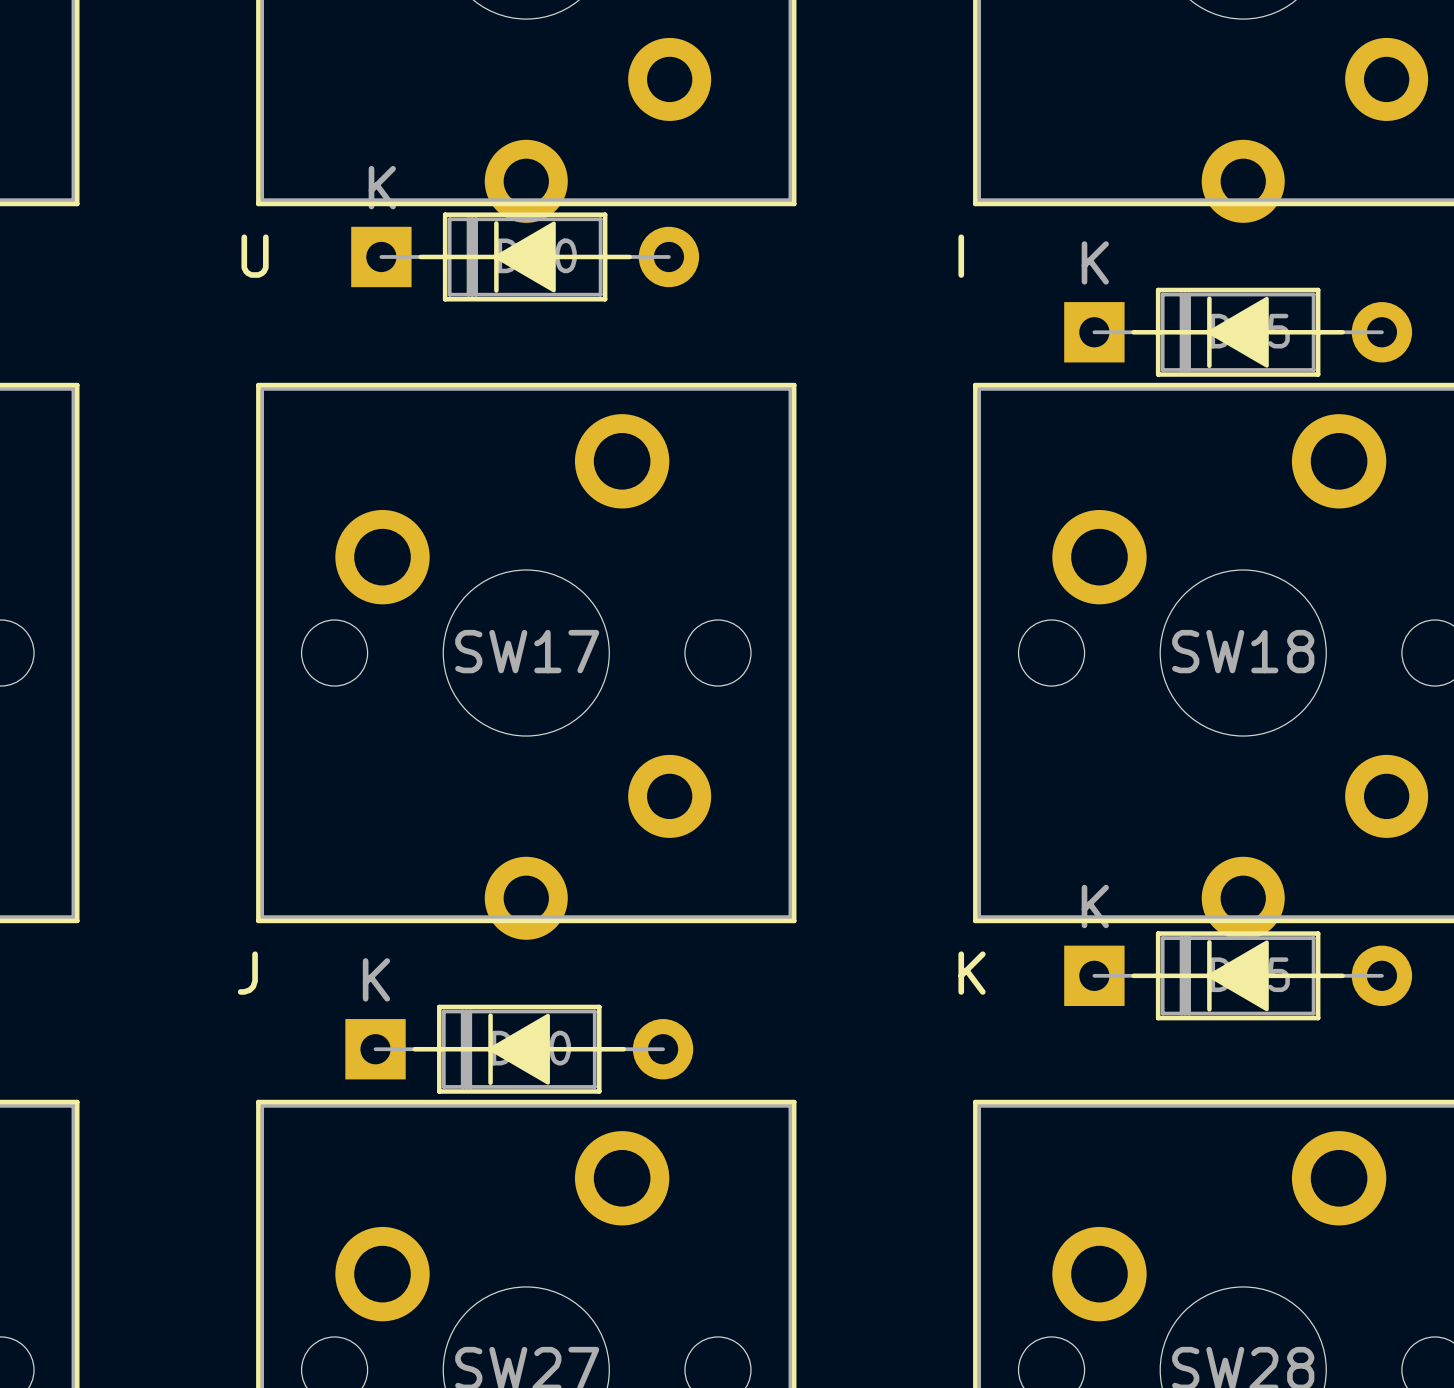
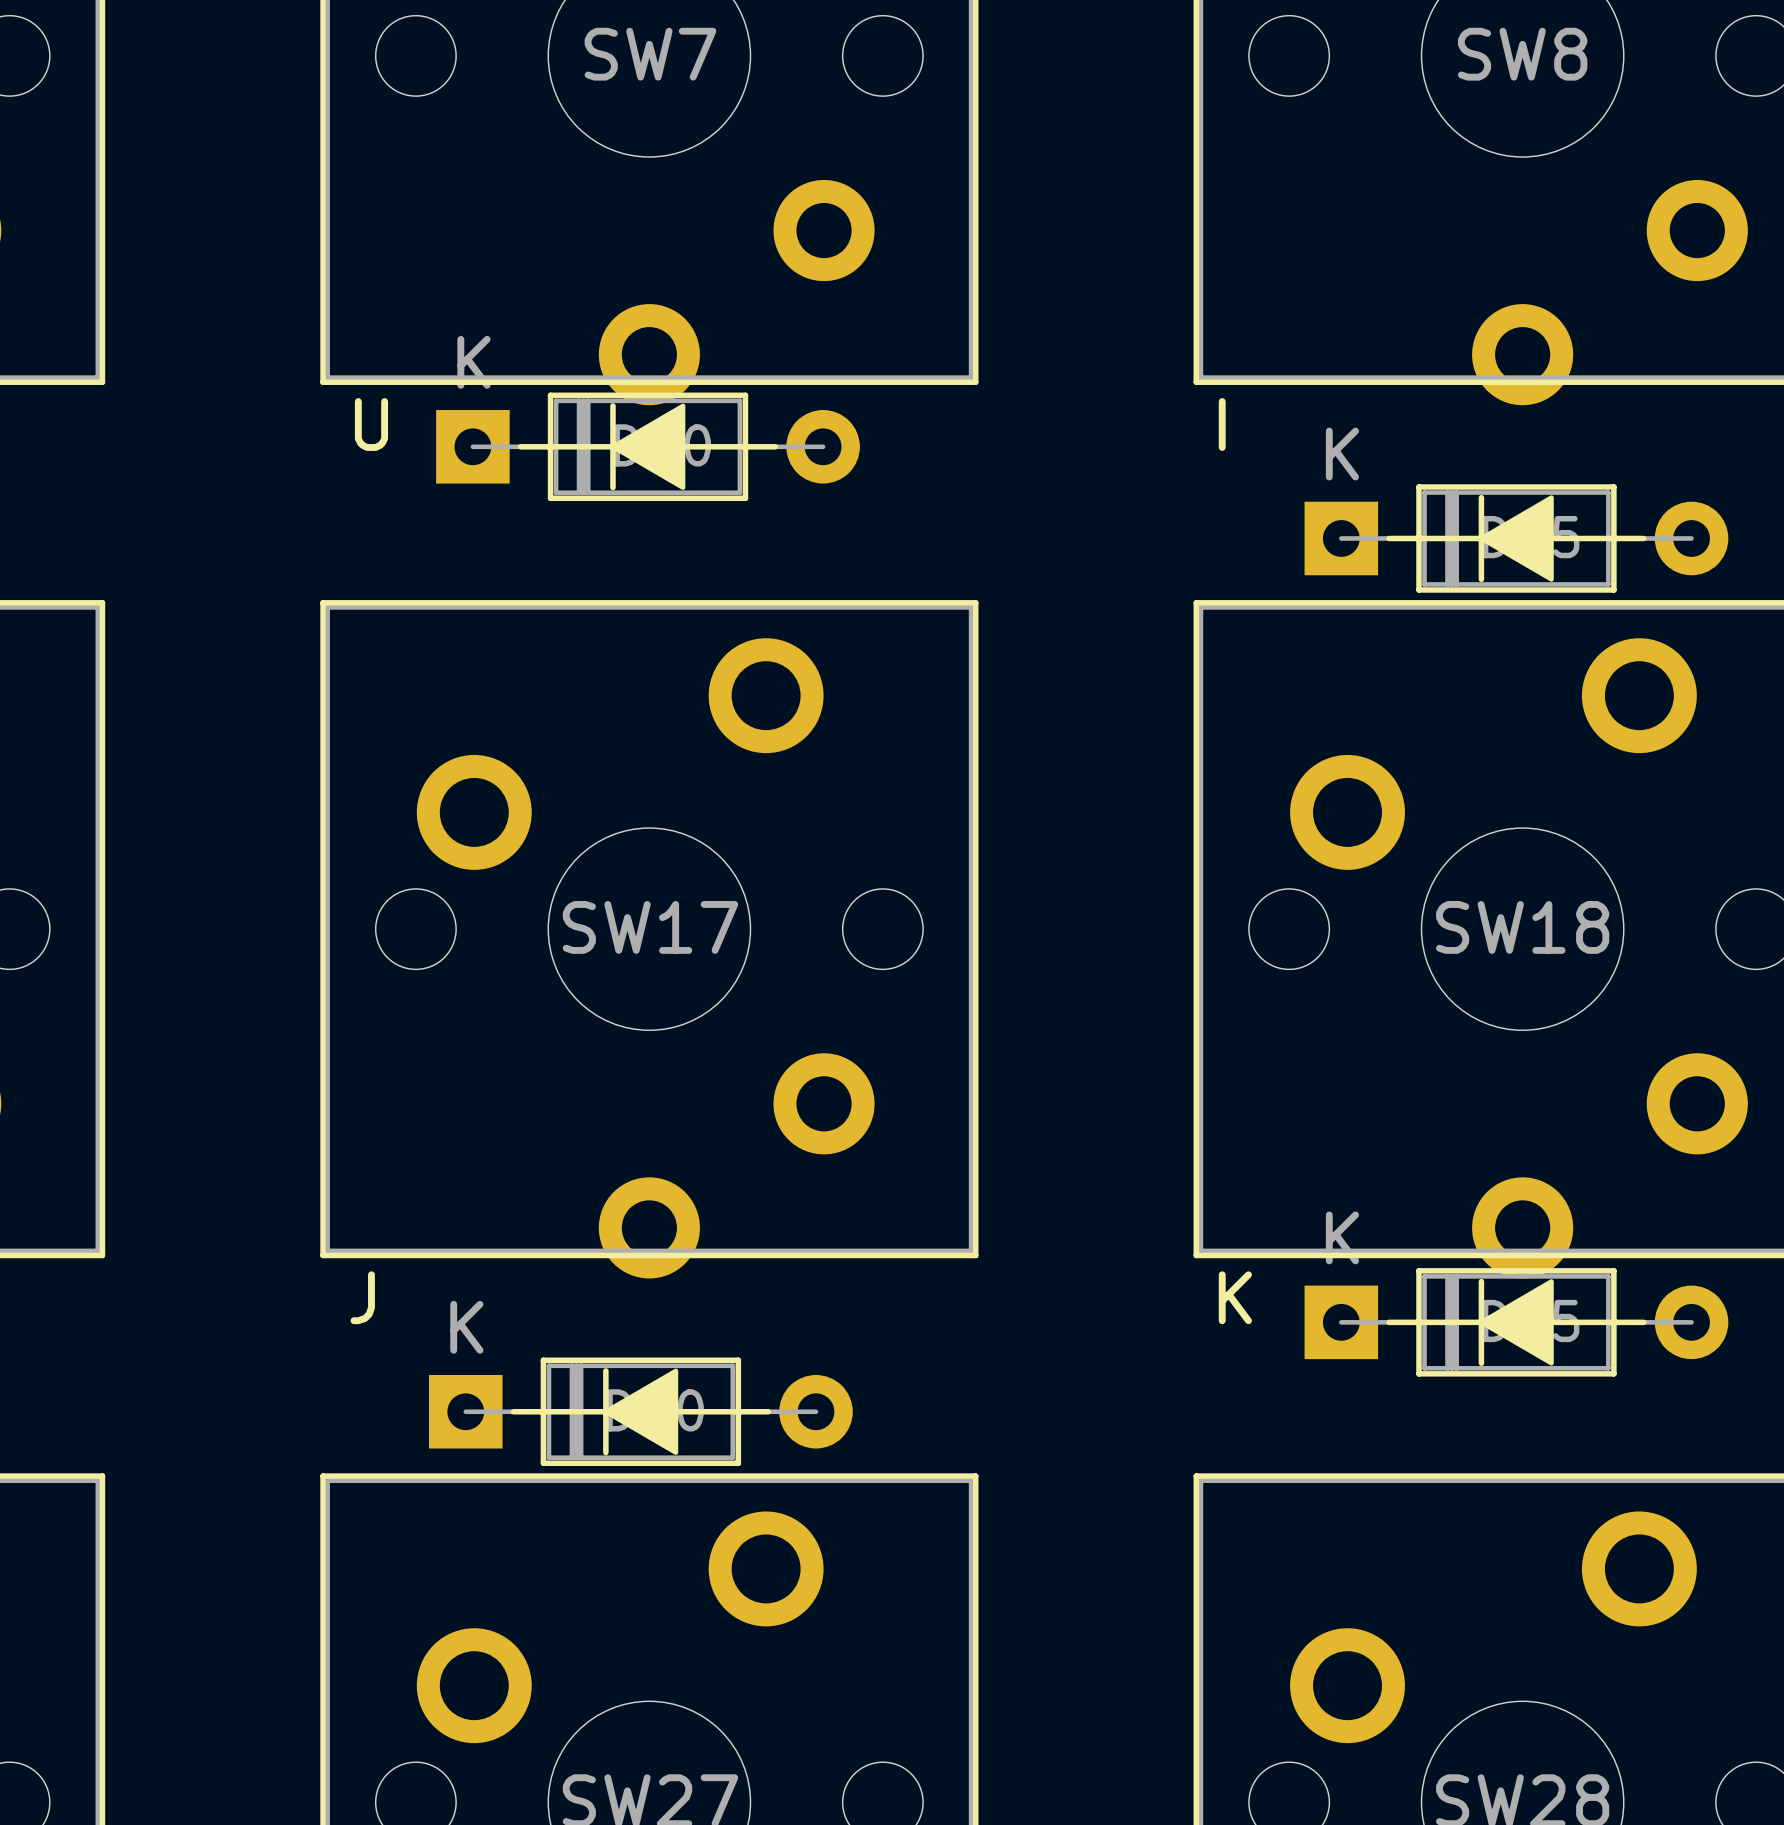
SW7 value position: U (255, 256) -> U (371, 424)
SW8 value position: I (961, 256) -> I (1222, 424)
SW17 value position: J (247, 973) -> J (362, 1297)
SW18 value position: K (972, 973) -> K (1235, 1297)

